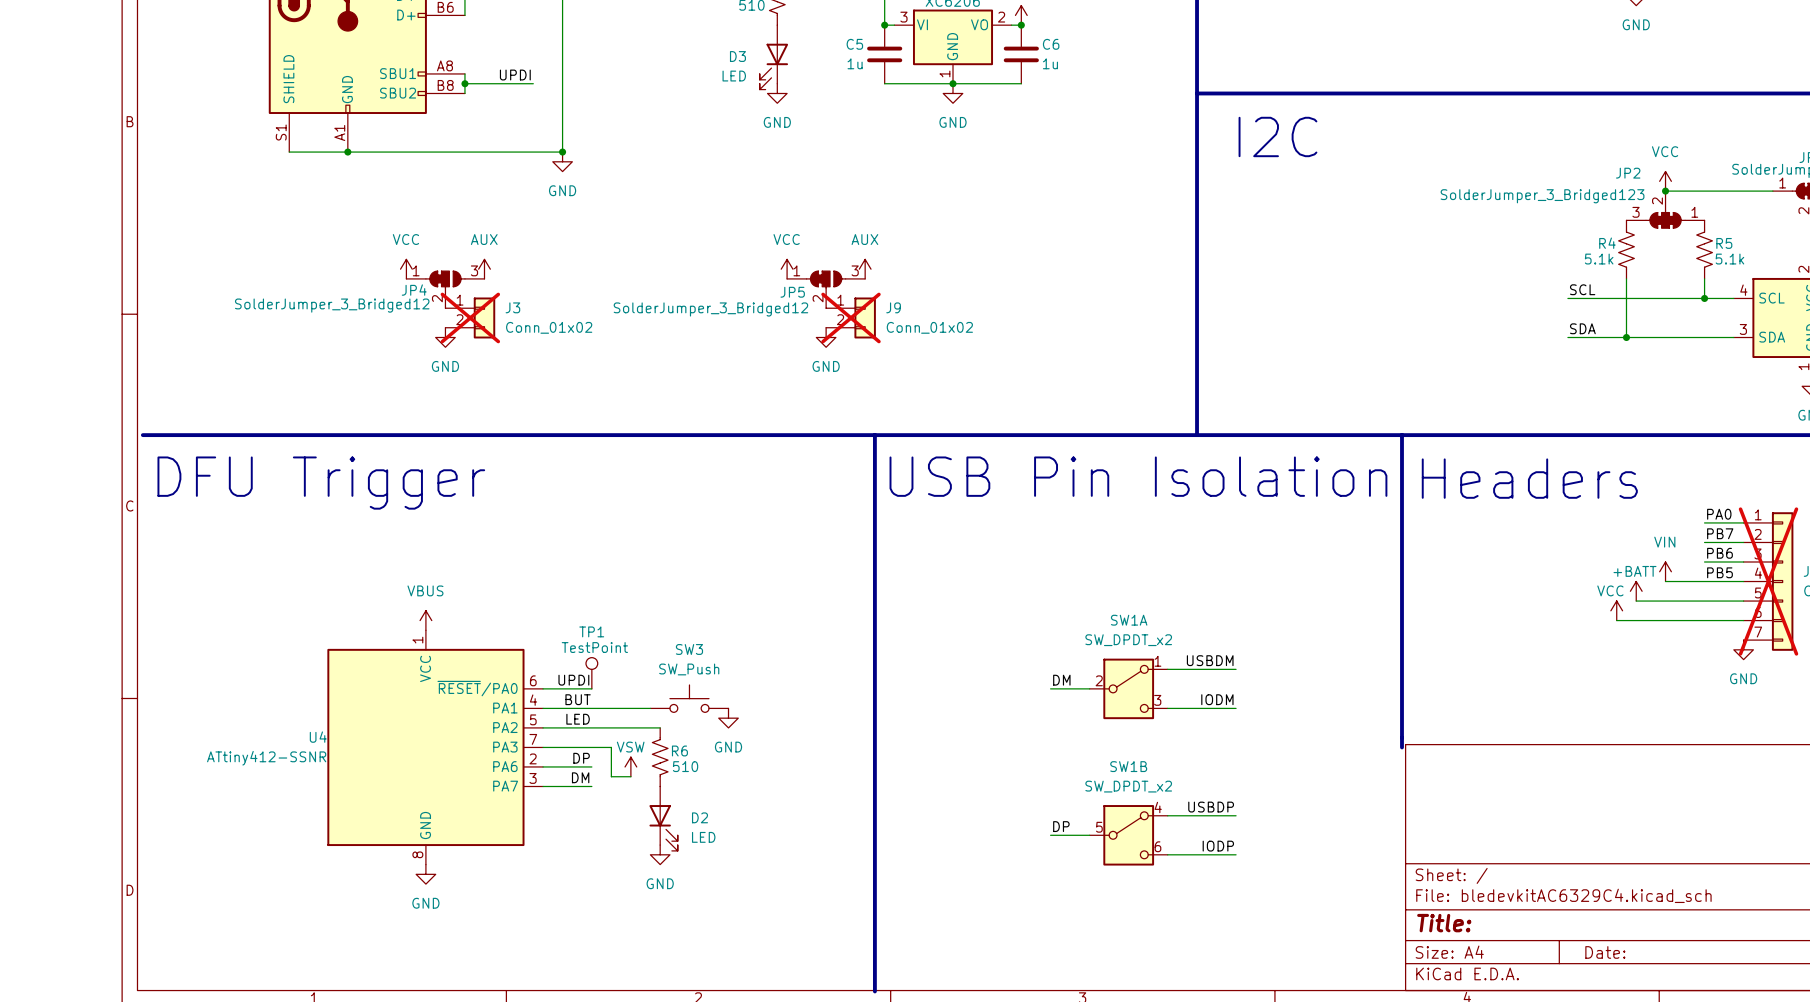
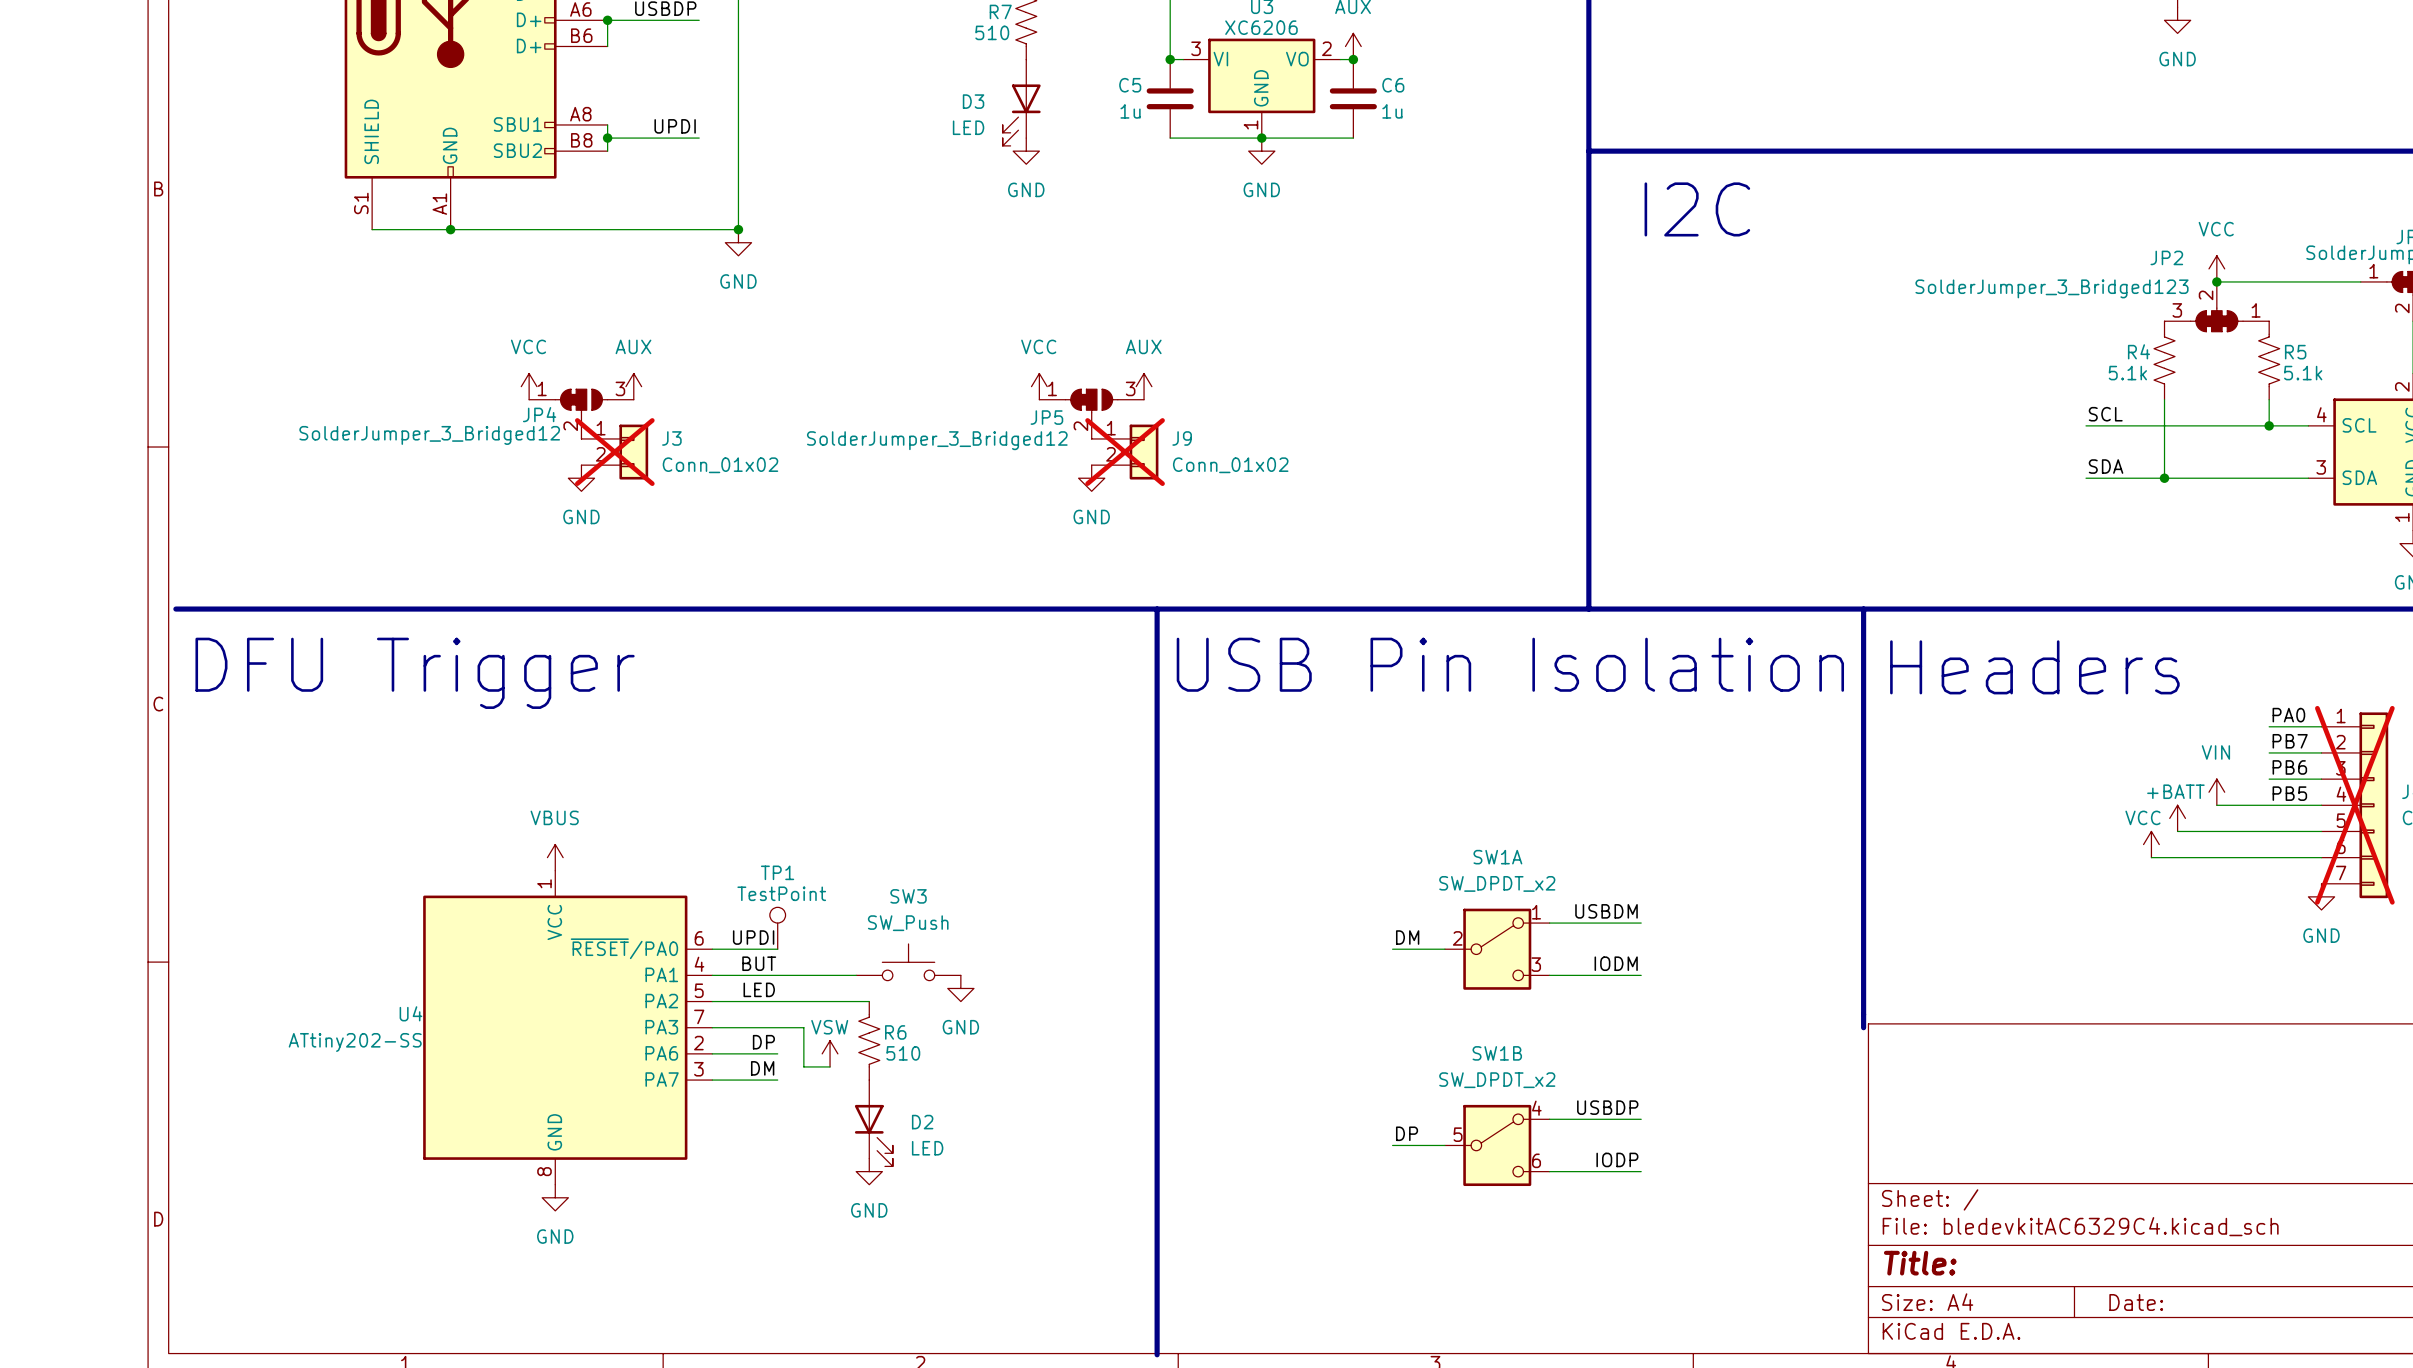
U4 value: ATtiny412-SSNR (266, 758) -> ATtiny202-SS (355, 1042)

